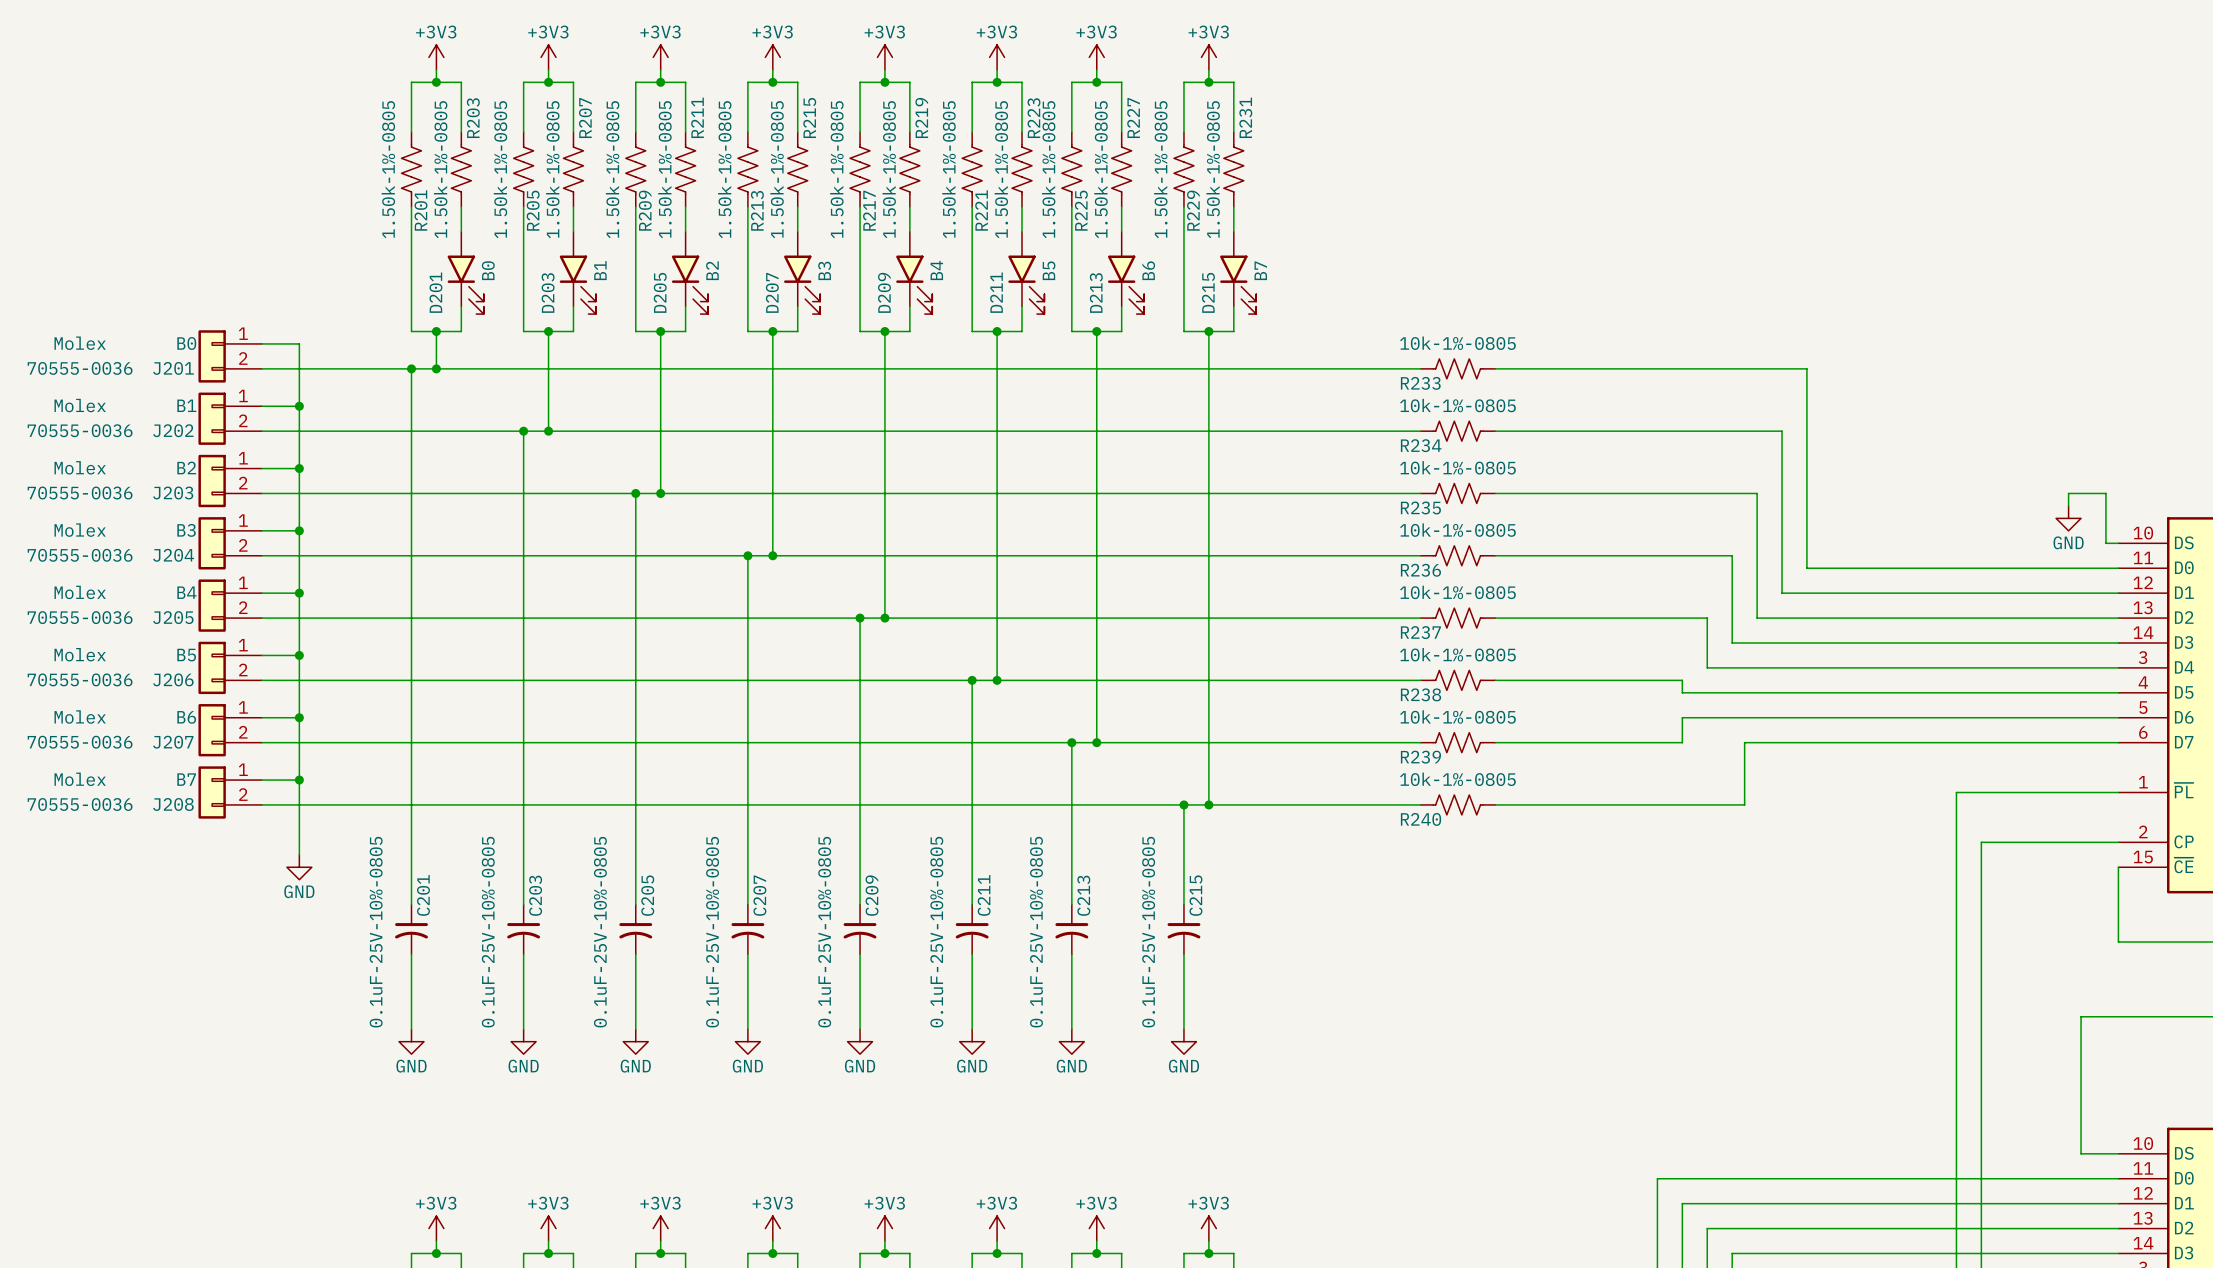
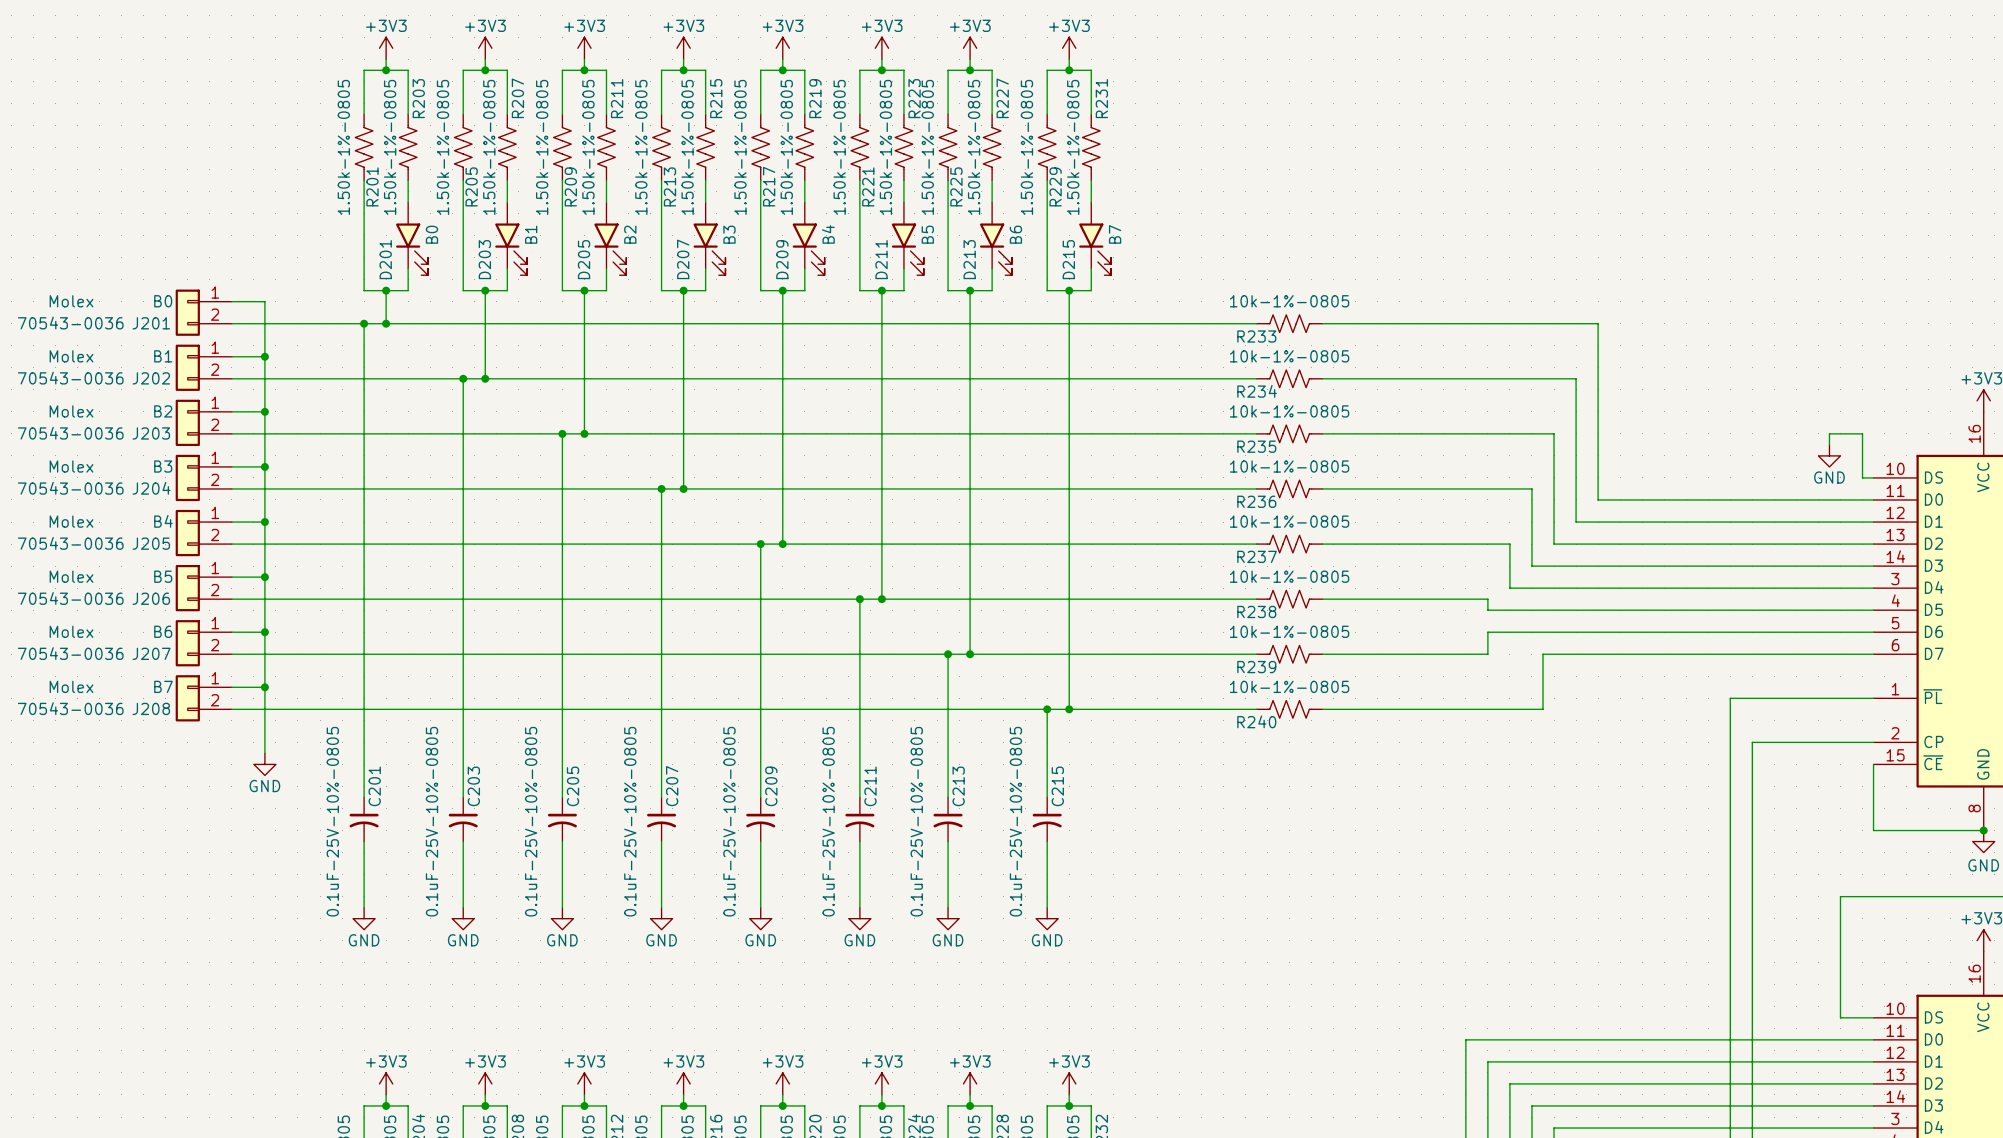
J201 text: 70555-0036 (80, 368) -> 70543-0036 (70, 323)
J202 text: 70555-0036 (80, 430) -> 70543-0036 (70, 378)
J203 text: 70555-0036 (80, 493) -> 70543-0036 (70, 433)
J204 text: 70555-0036 (80, 555) -> 70543-0036 (70, 488)
J205 text: 70555-0036 (80, 617) -> 70543-0036 (70, 543)
J206 text: 70555-0036 (80, 679) -> 70543-0036 (70, 598)
J207 text: 70555-0036 (80, 742) -> 70543-0036 (70, 653)
J208 text: 70555-0036 (80, 804) -> 70543-0036 (70, 708)

